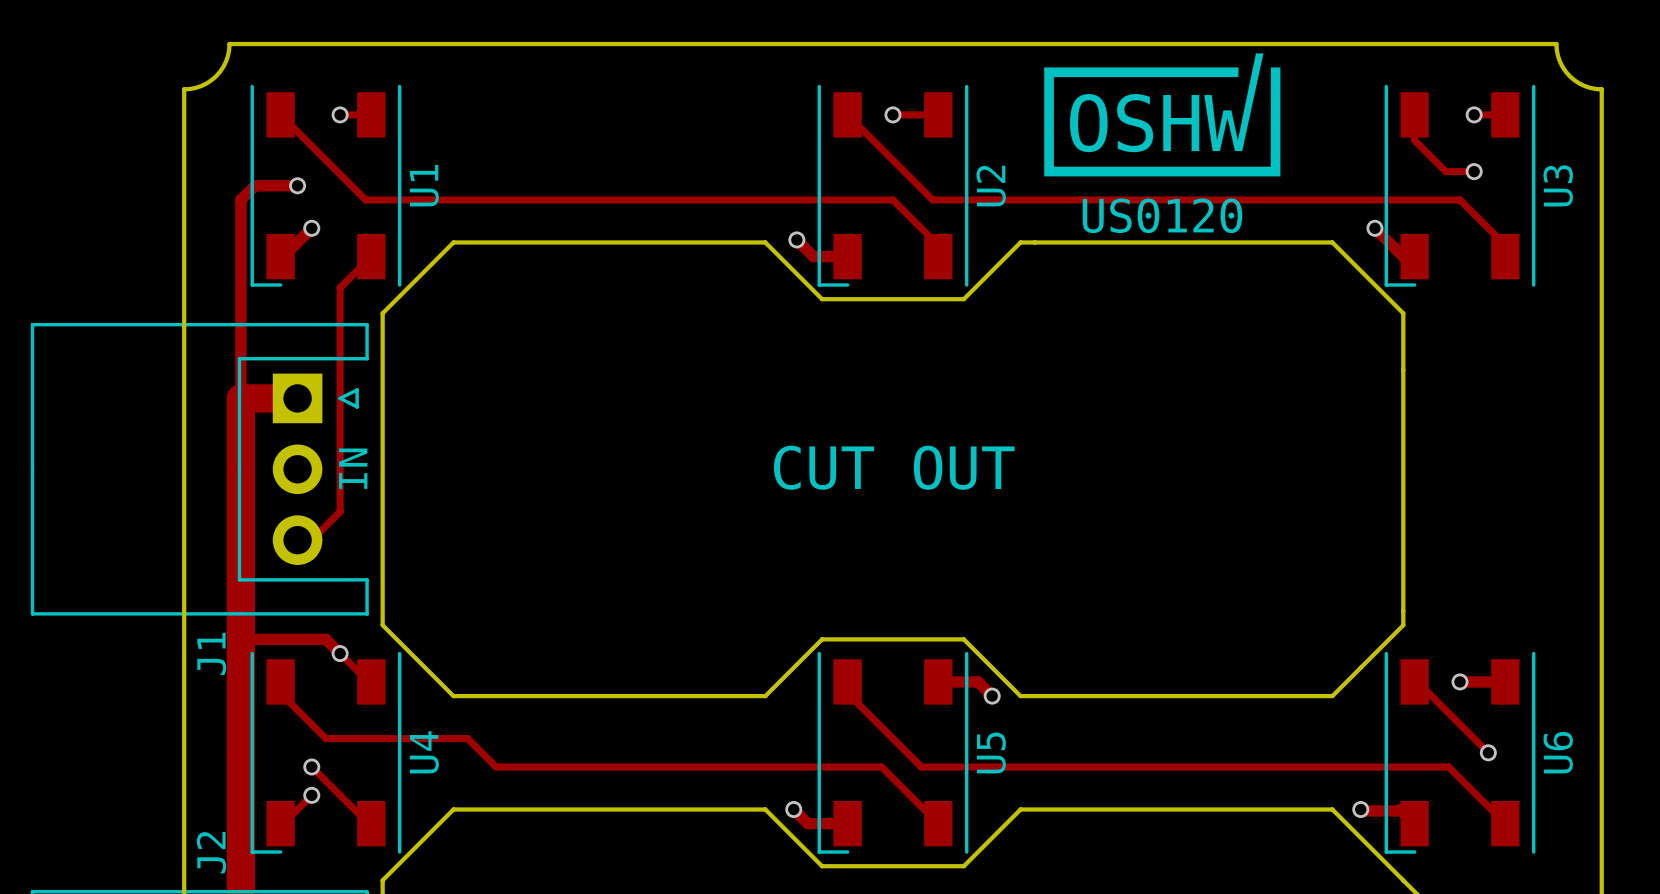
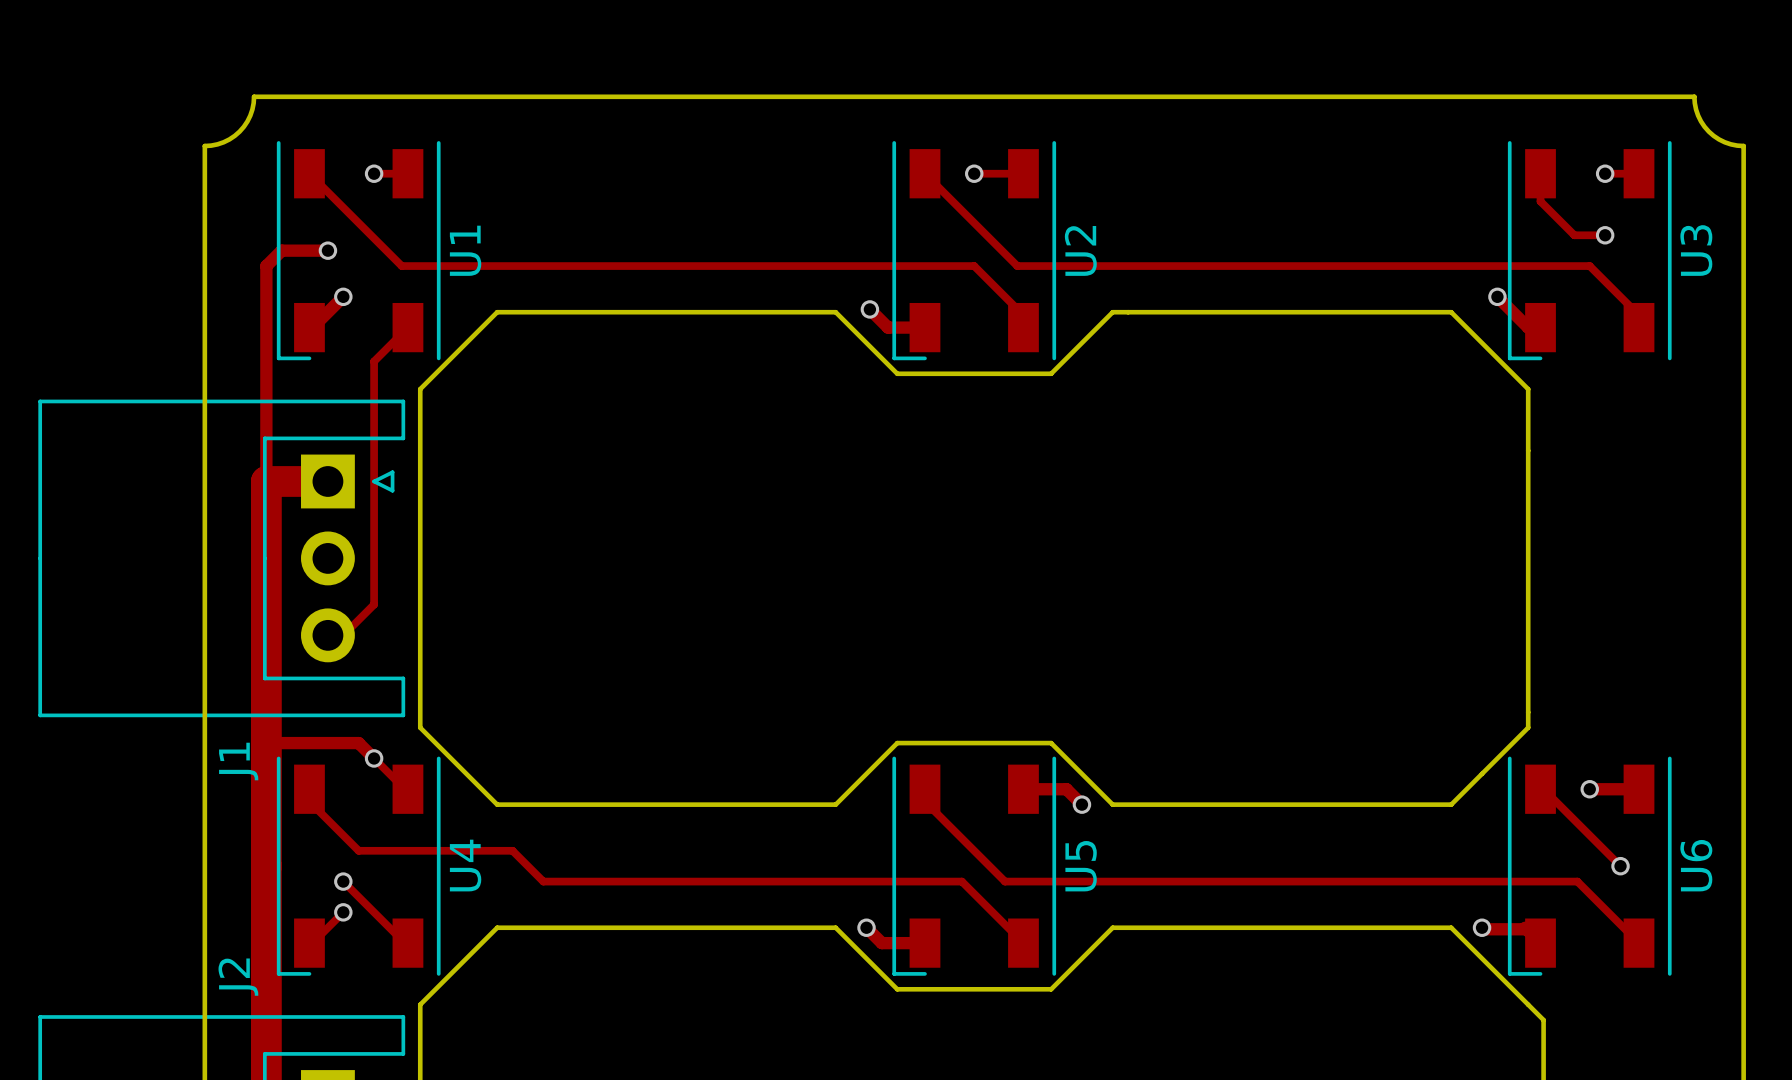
drawing: [1044, 53, 1281, 177] -> none
text: CUT OUT (894, 467) -> none
text: IN (353, 468) -> none

